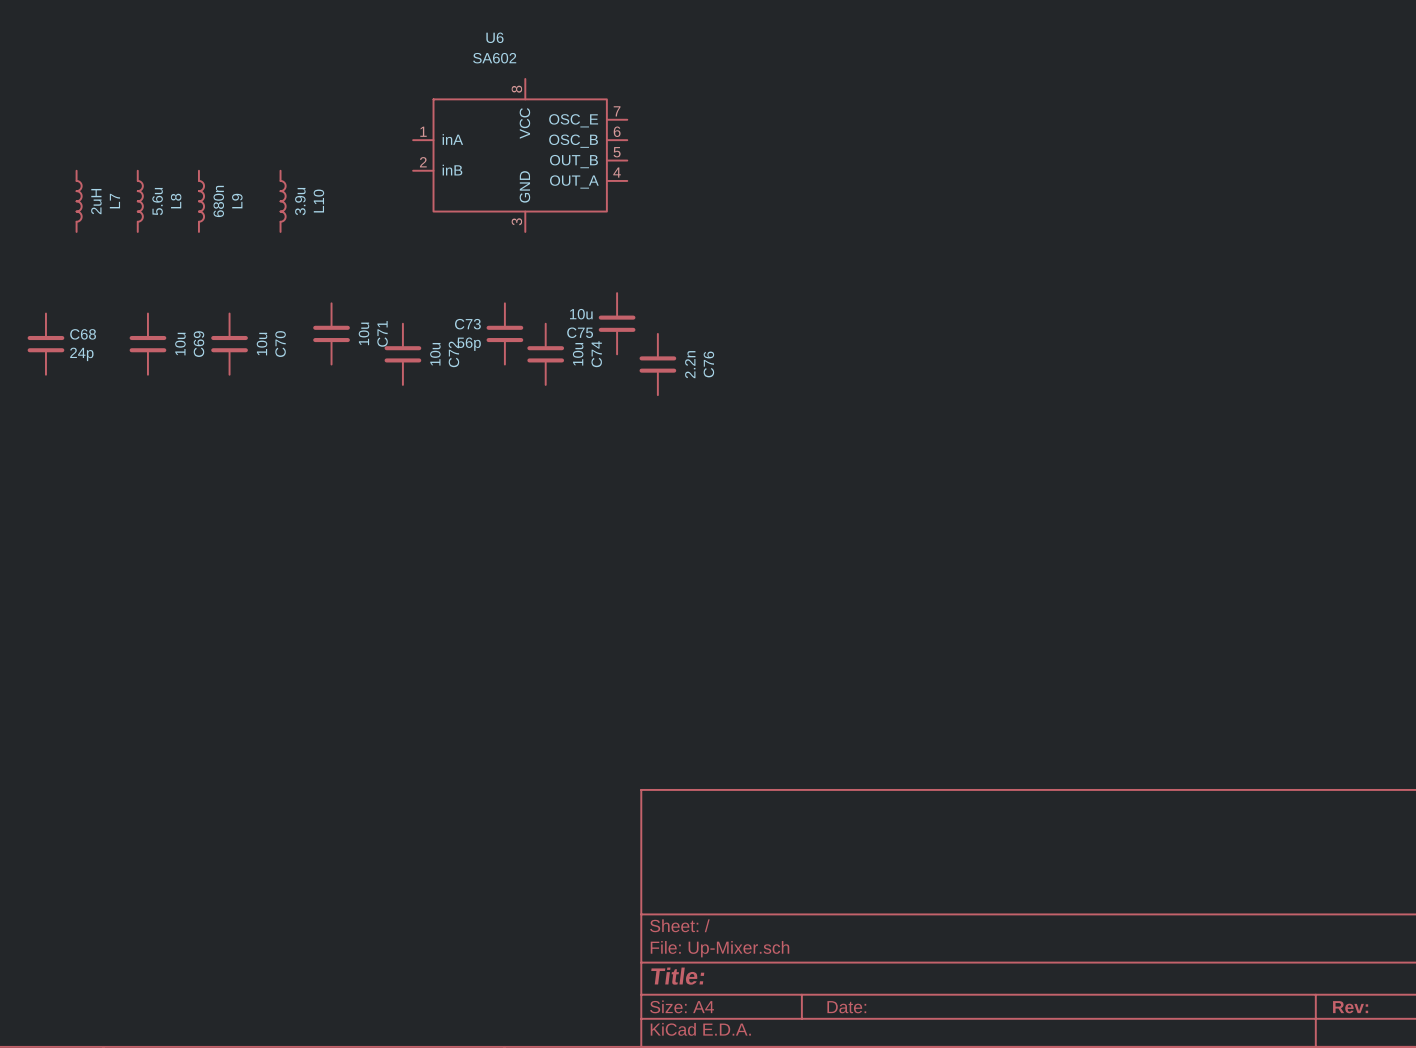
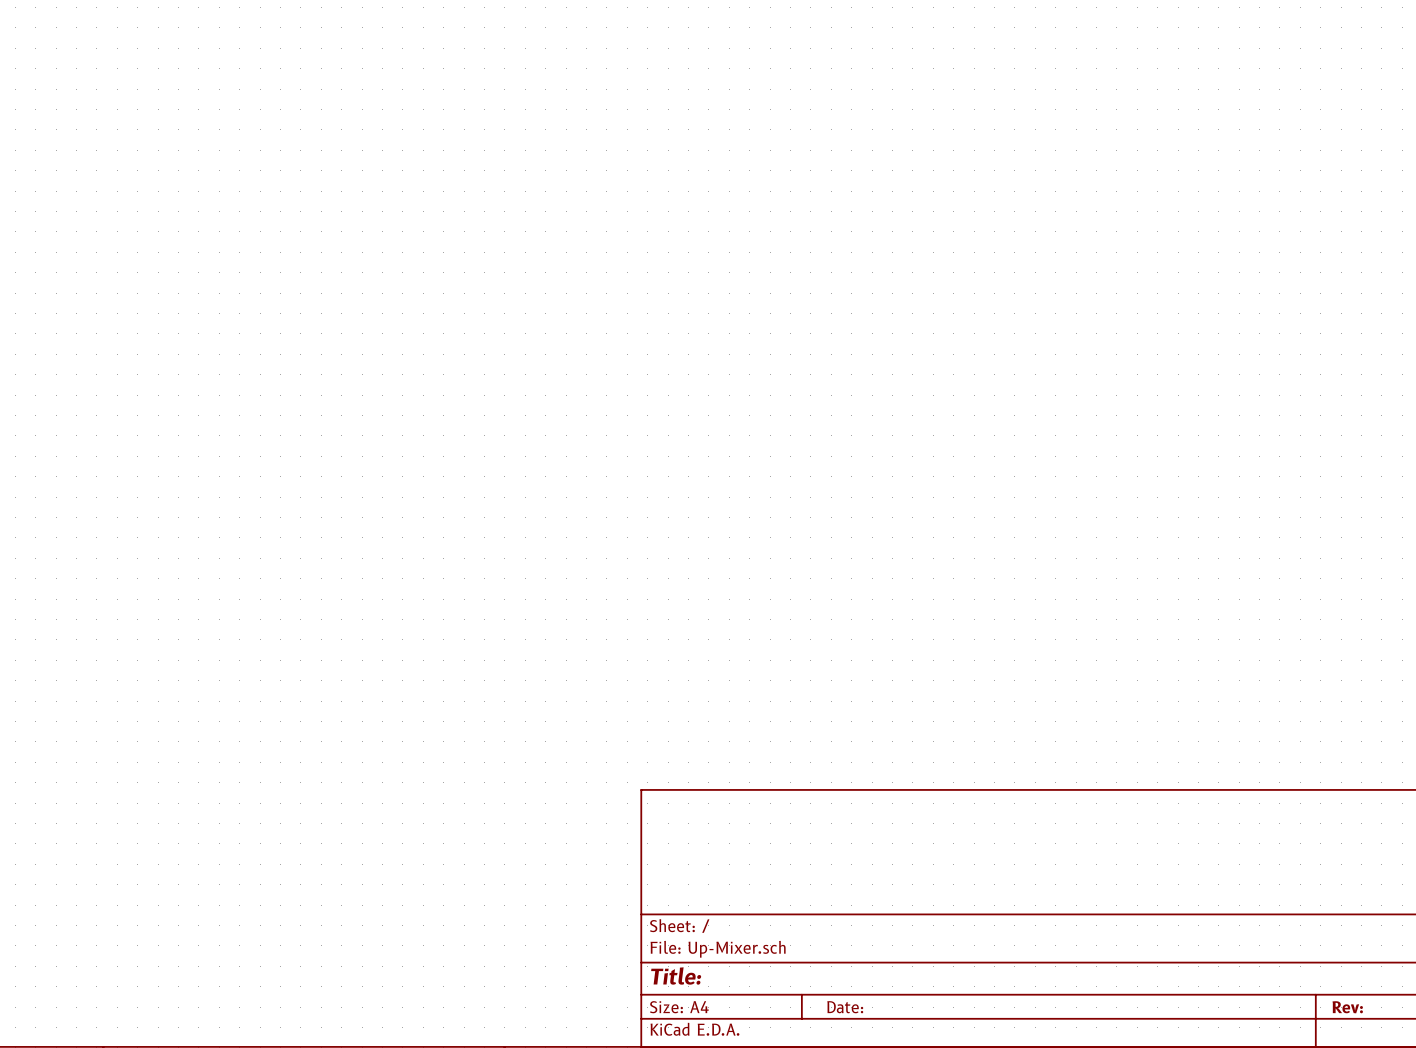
U6: SA602 (520, 155) -> none
L7: 2uH (79, 201) -> none
L8: 5.6u (140, 201) -> none
L9: 680n (201, 201) -> none
L10: 3.9u (283, 201) -> none
C75: 10u (617, 323) -> none
C71: 10u (331, 333) -> none
C73: 56p (504, 333) -> none
C68: 24p (45, 344) -> none
C69: 10u (147, 344) -> none
C70: 10u (229, 344) -> none
C72: 10u (402, 354) -> none
C74: 10u (545, 354) -> none
C76: 2.2n (657, 364) -> none

